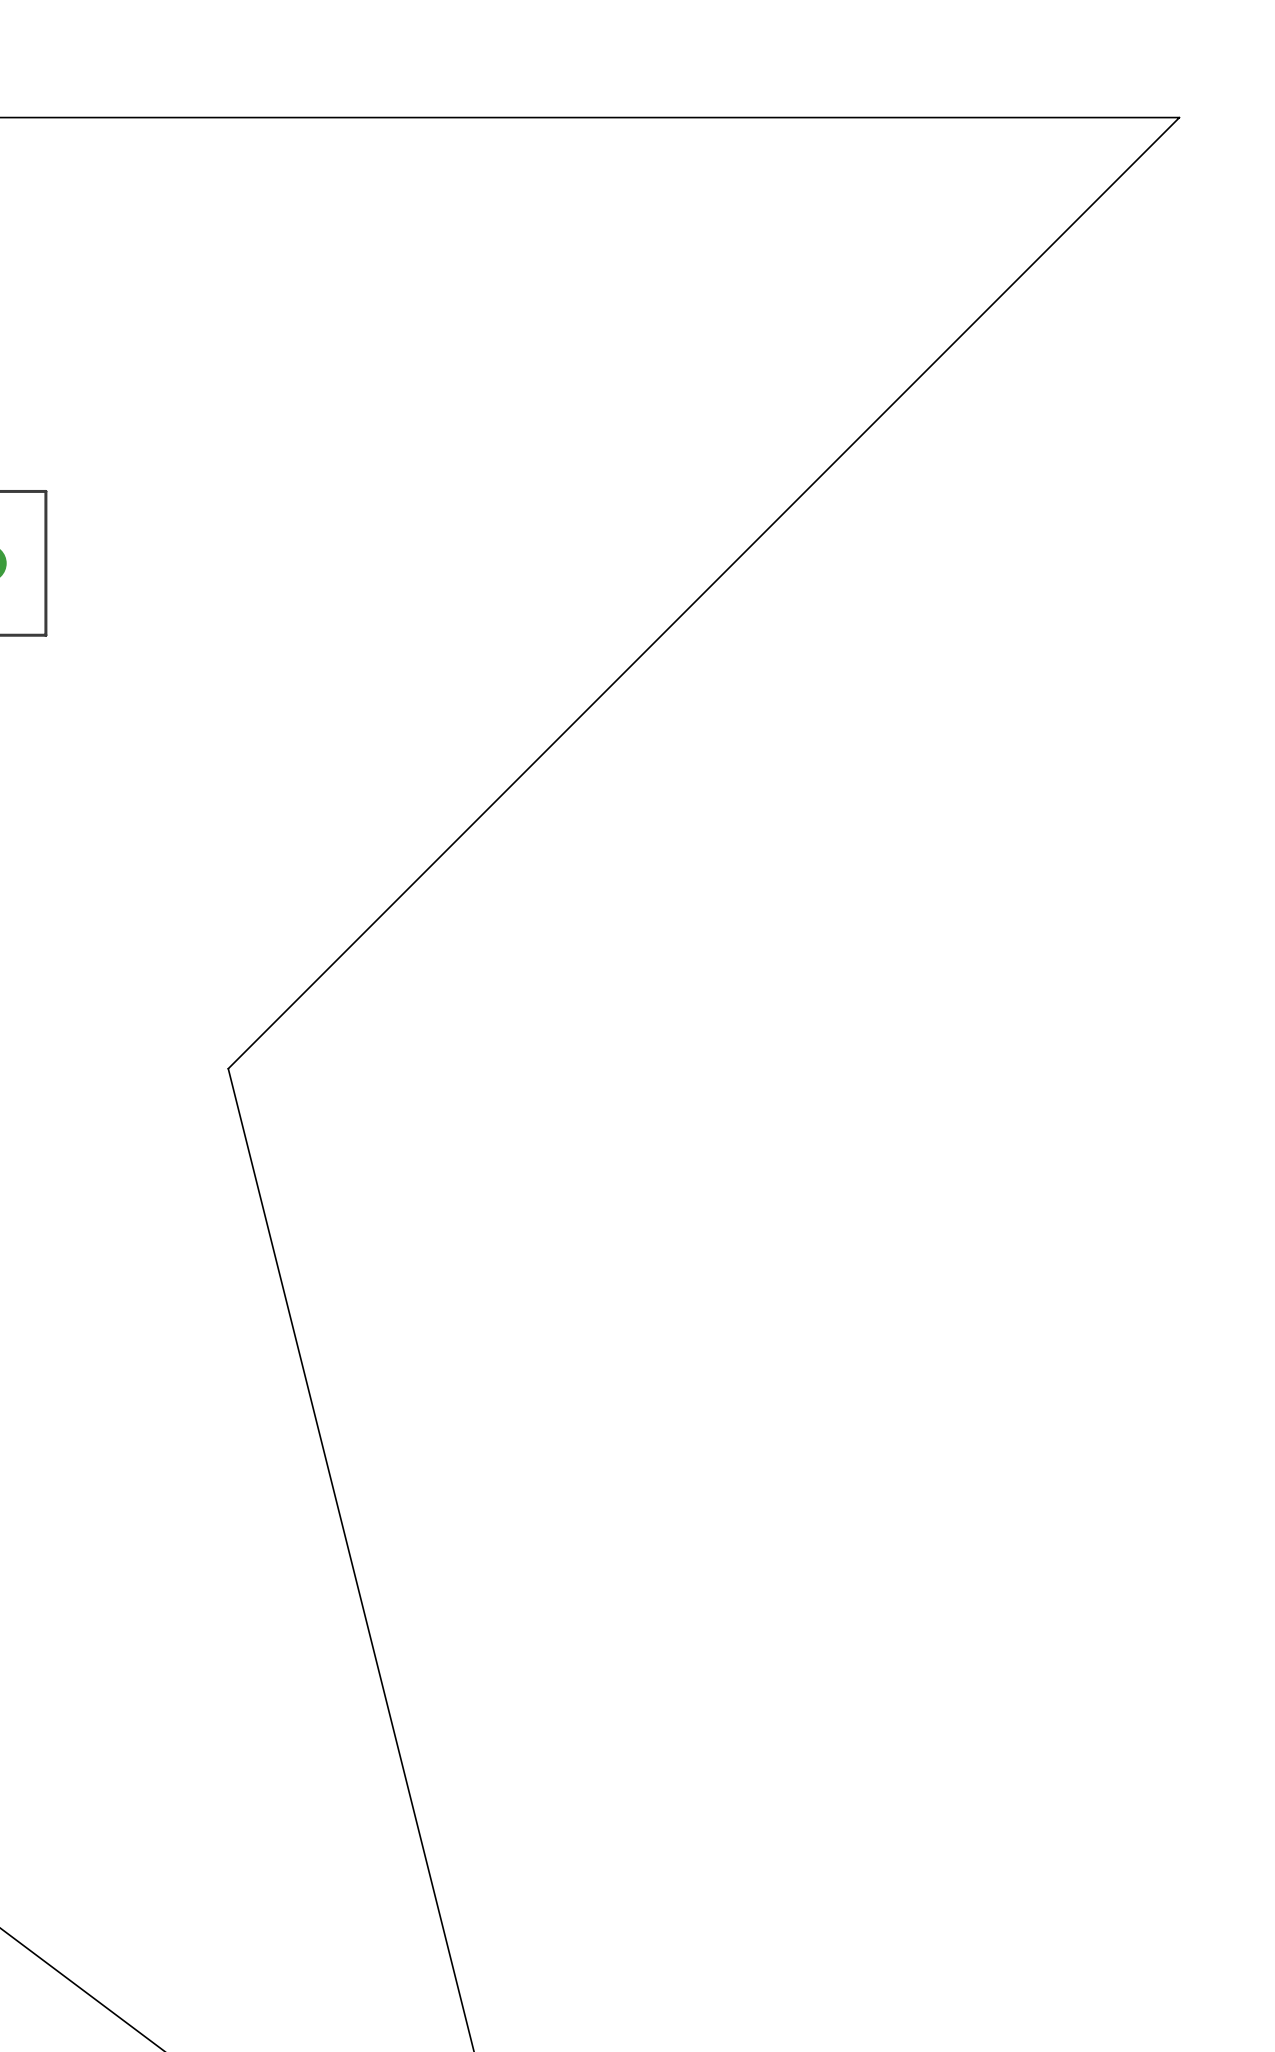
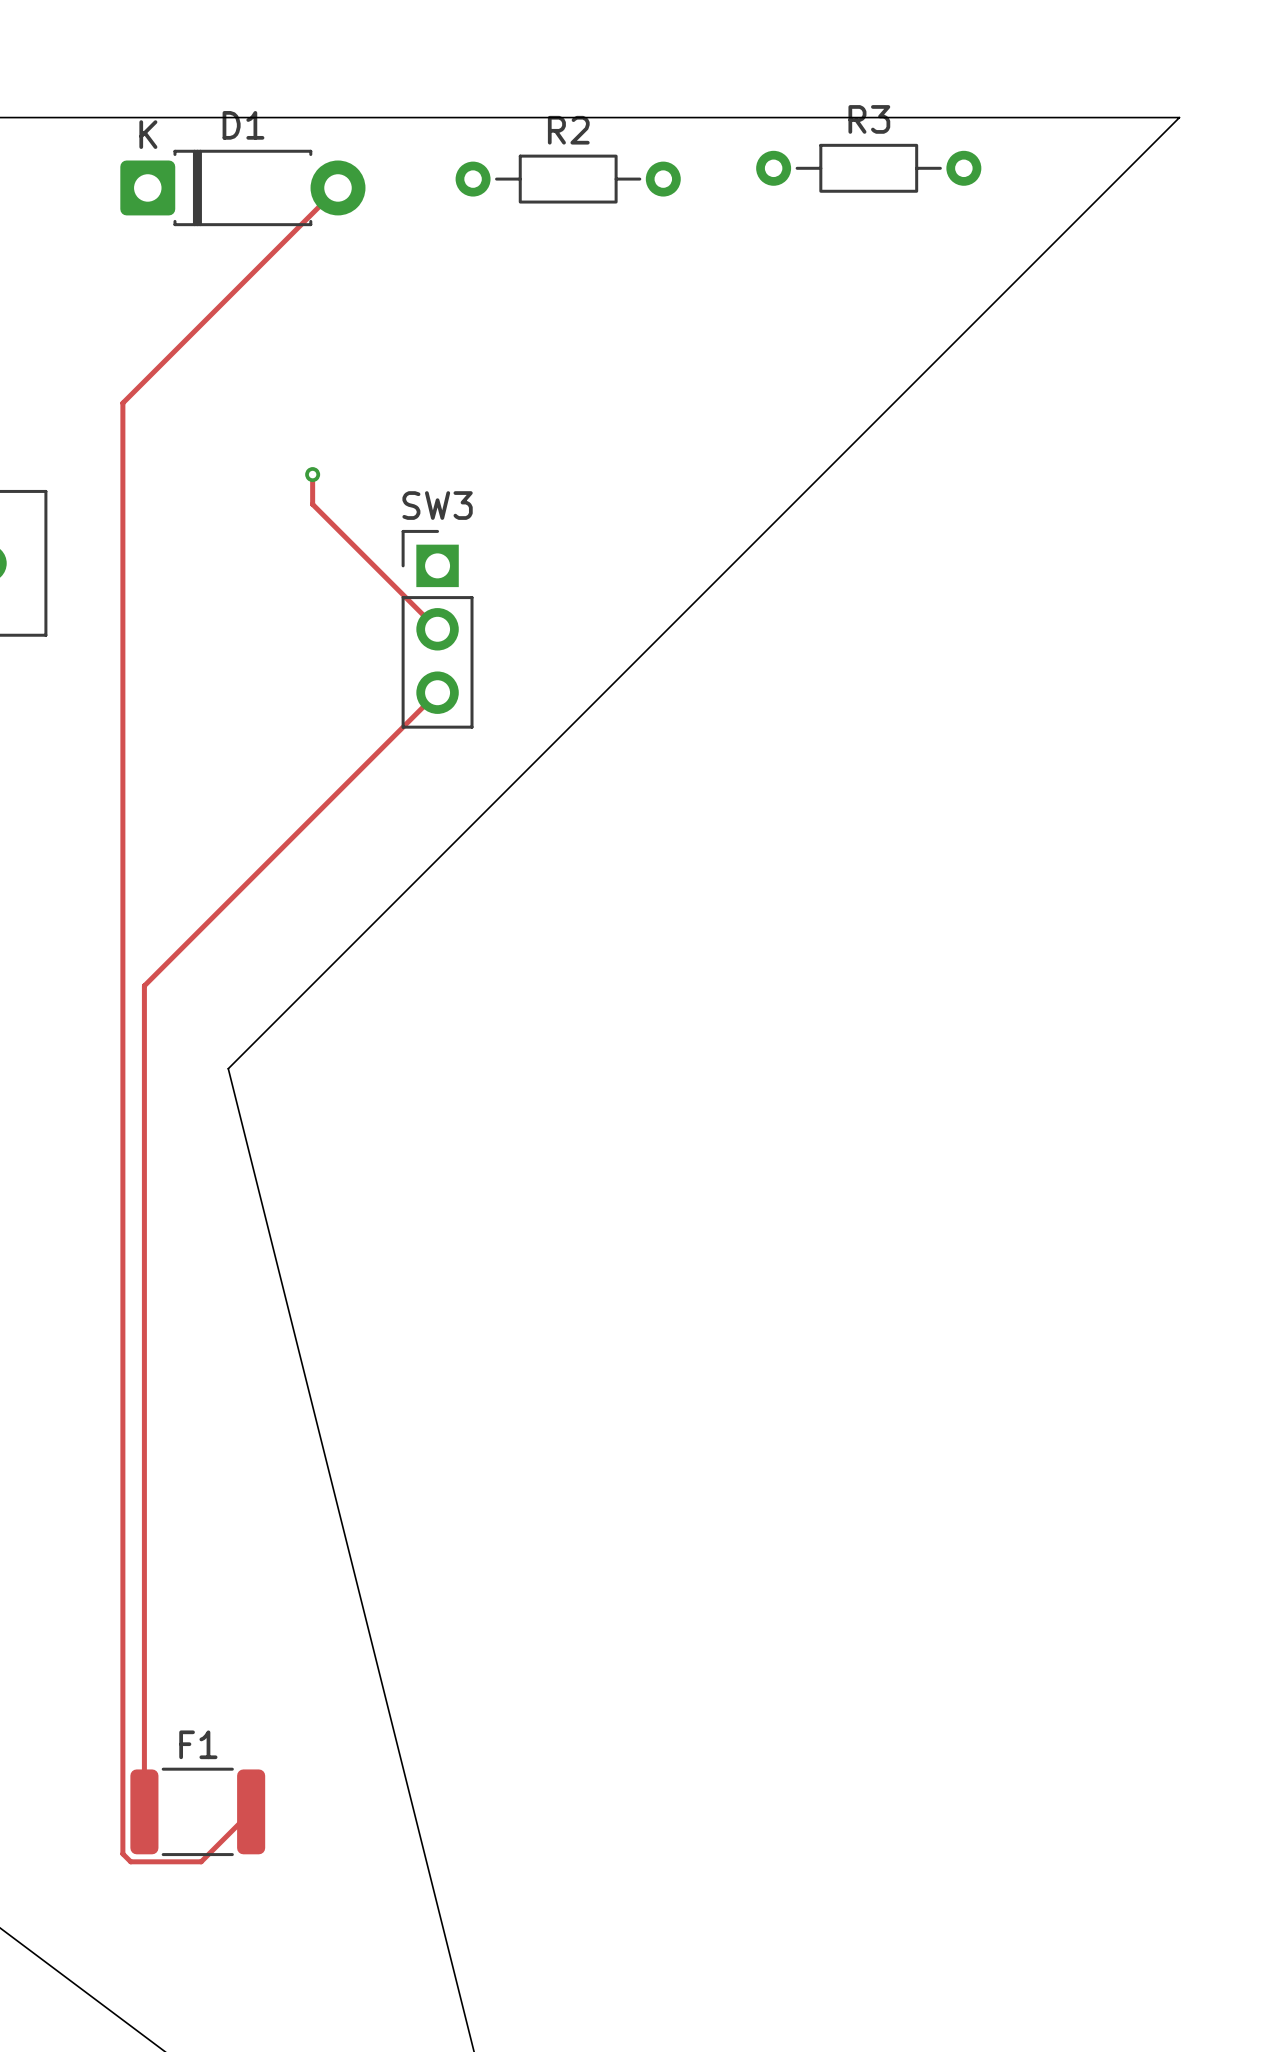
R3: none -> (868, 168)
R2: none -> (568, 179)
D1: none -> (242, 187)
track: none -> (338, 187) (122, 403) (122, 1853) (130, 1861) (201, 1861) (251, 1811)
track: none -> (312, 474) (312, 504) (437, 629)
via: none -> (312, 474)
SW3: none -> (437, 629)
track: none -> (437, 692) (144, 985) (144, 1811)
F1: none -> (197, 1811)

